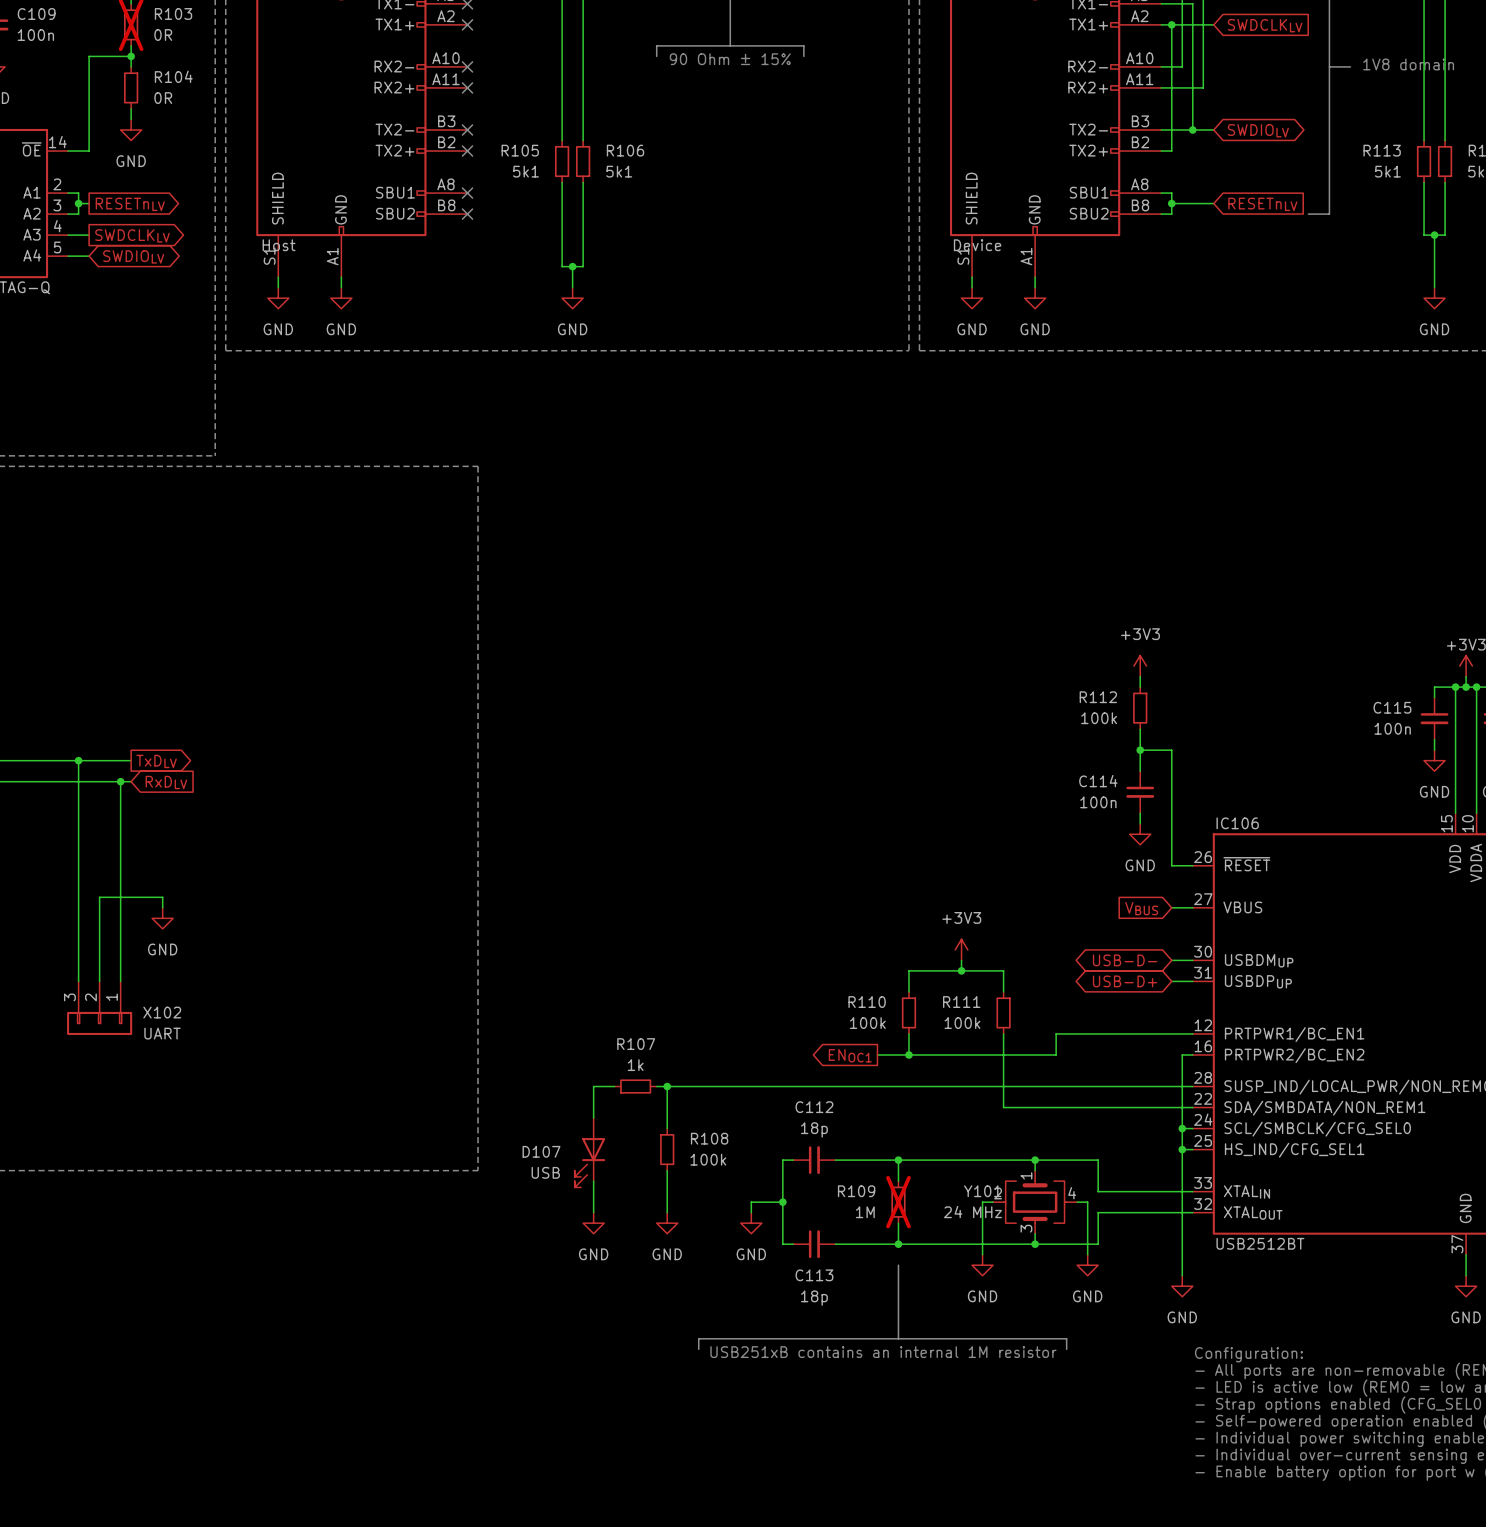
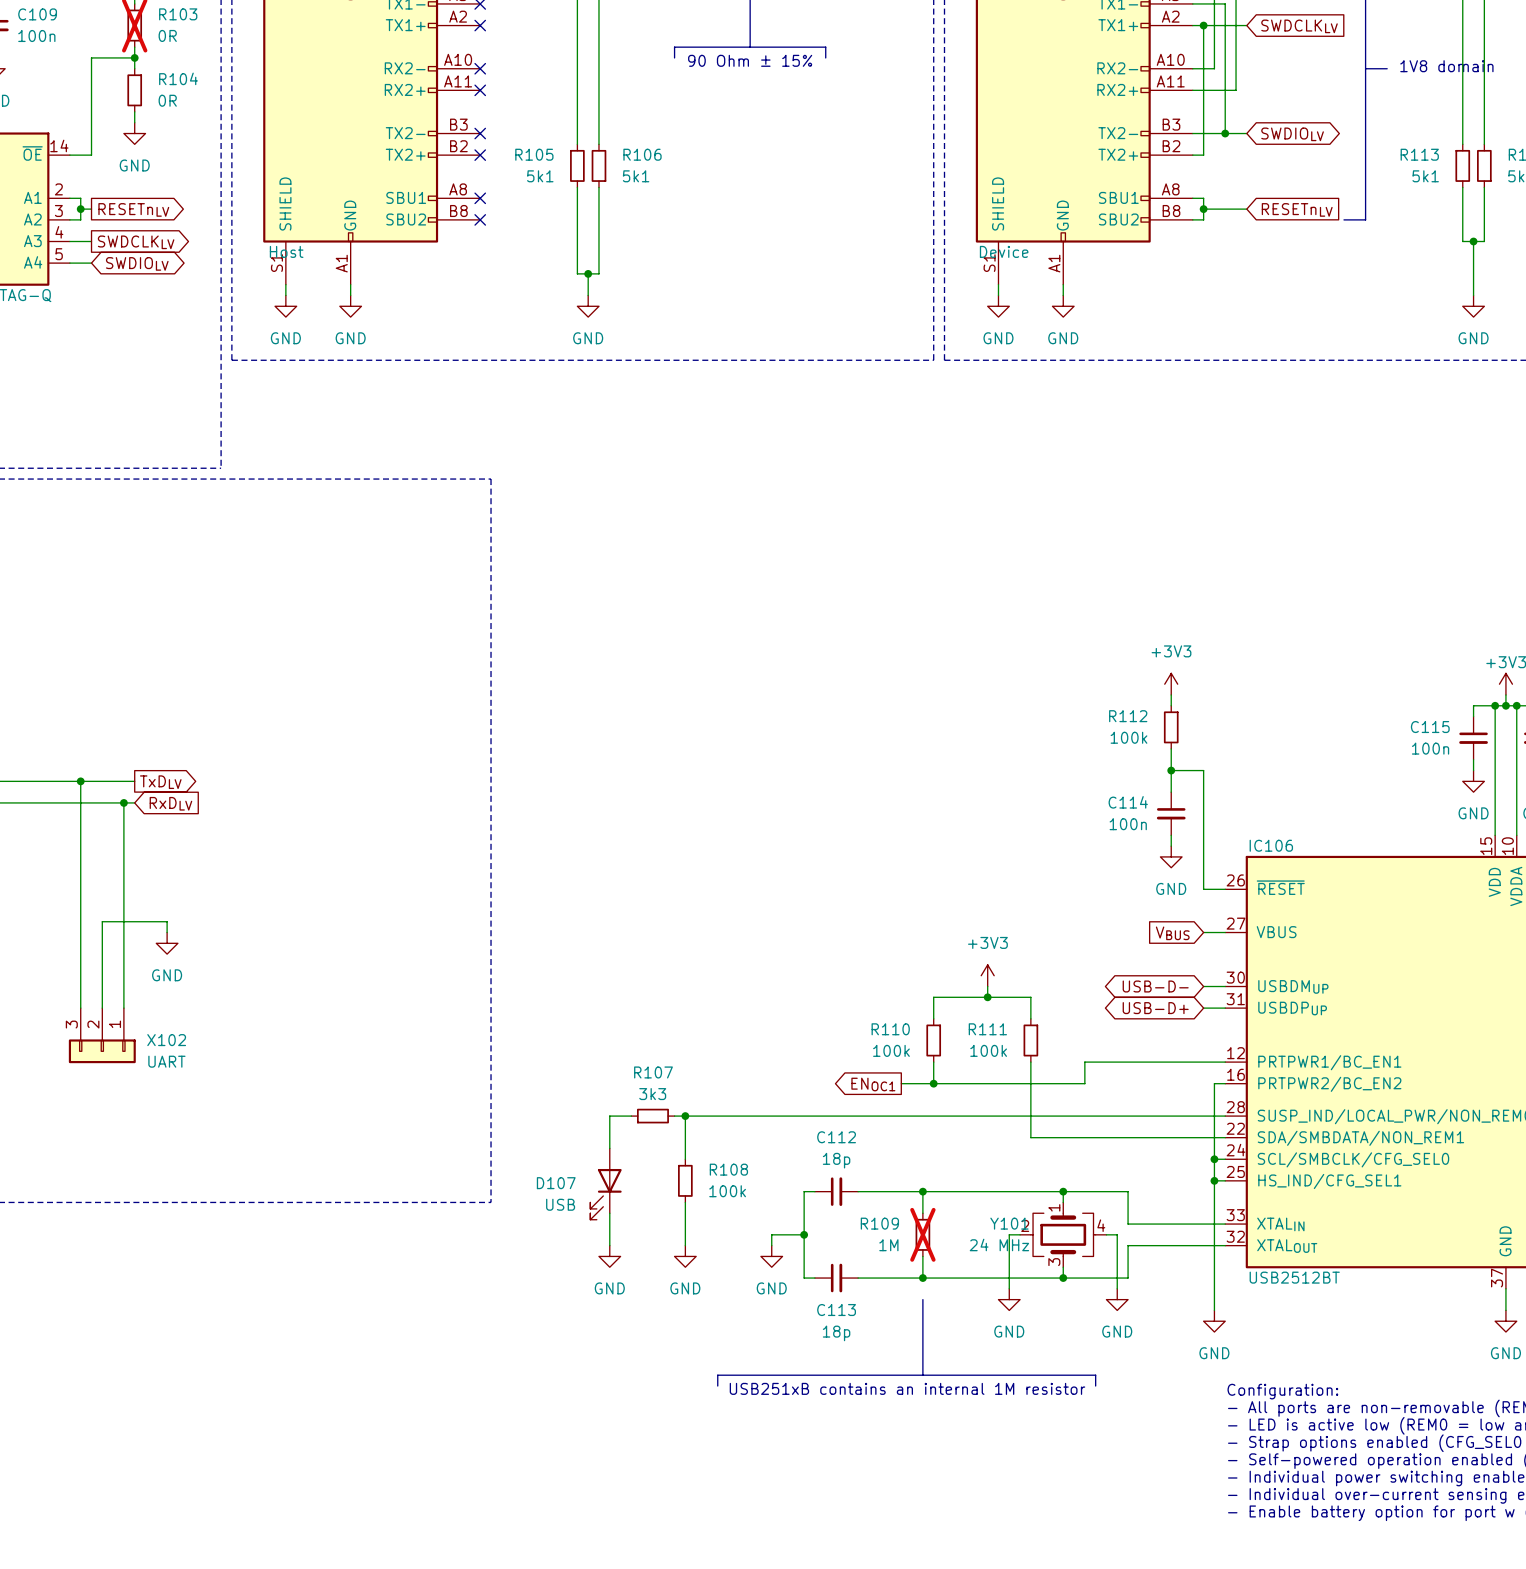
R107 value: 1k (635, 1065) -> 3k3 (652, 1094)

